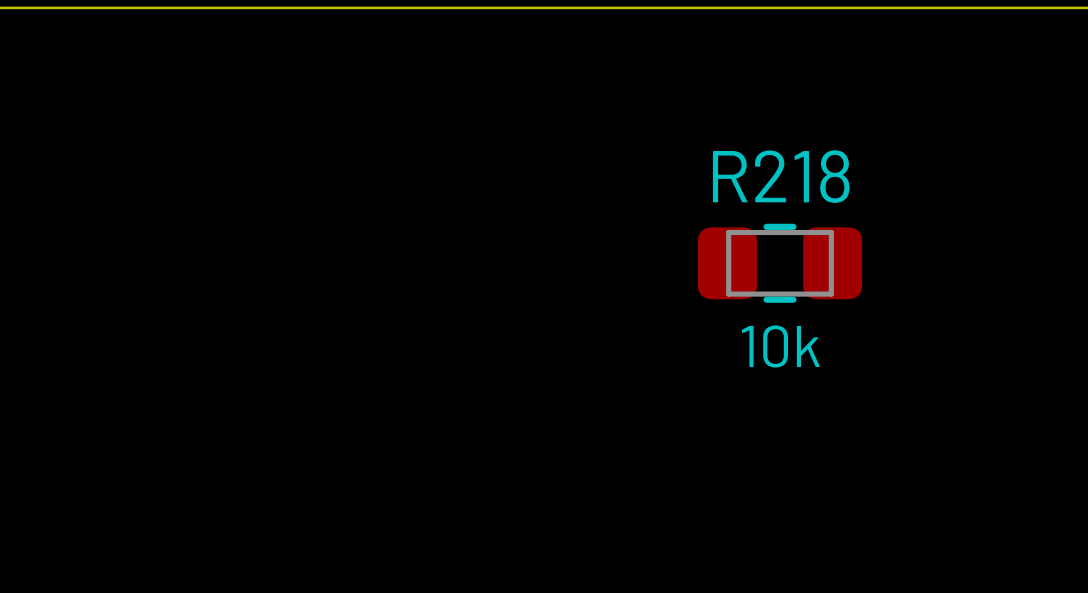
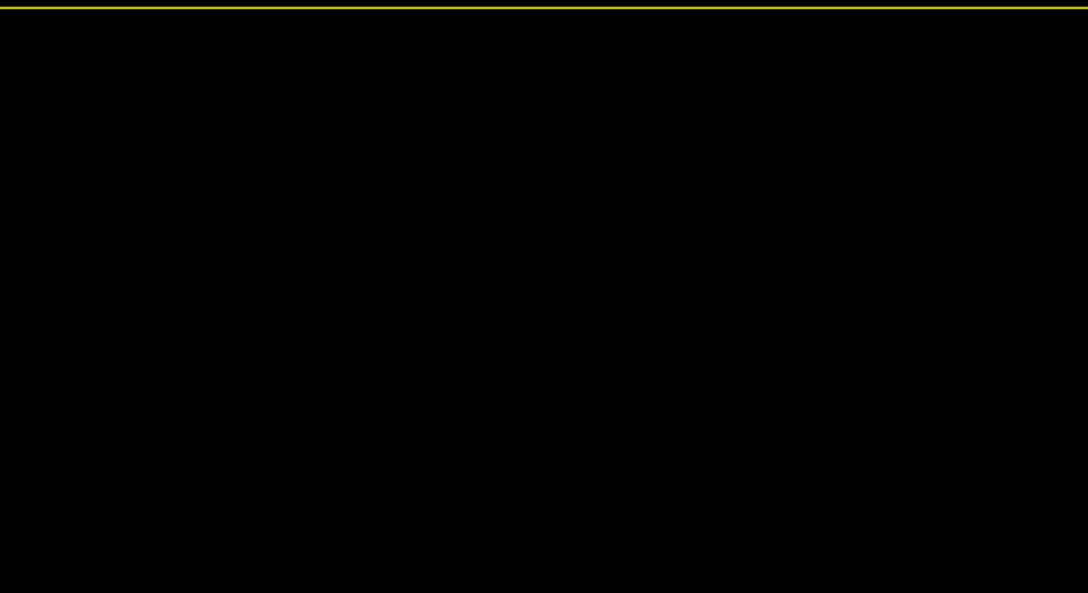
R218: 10k (780, 263) -> none

